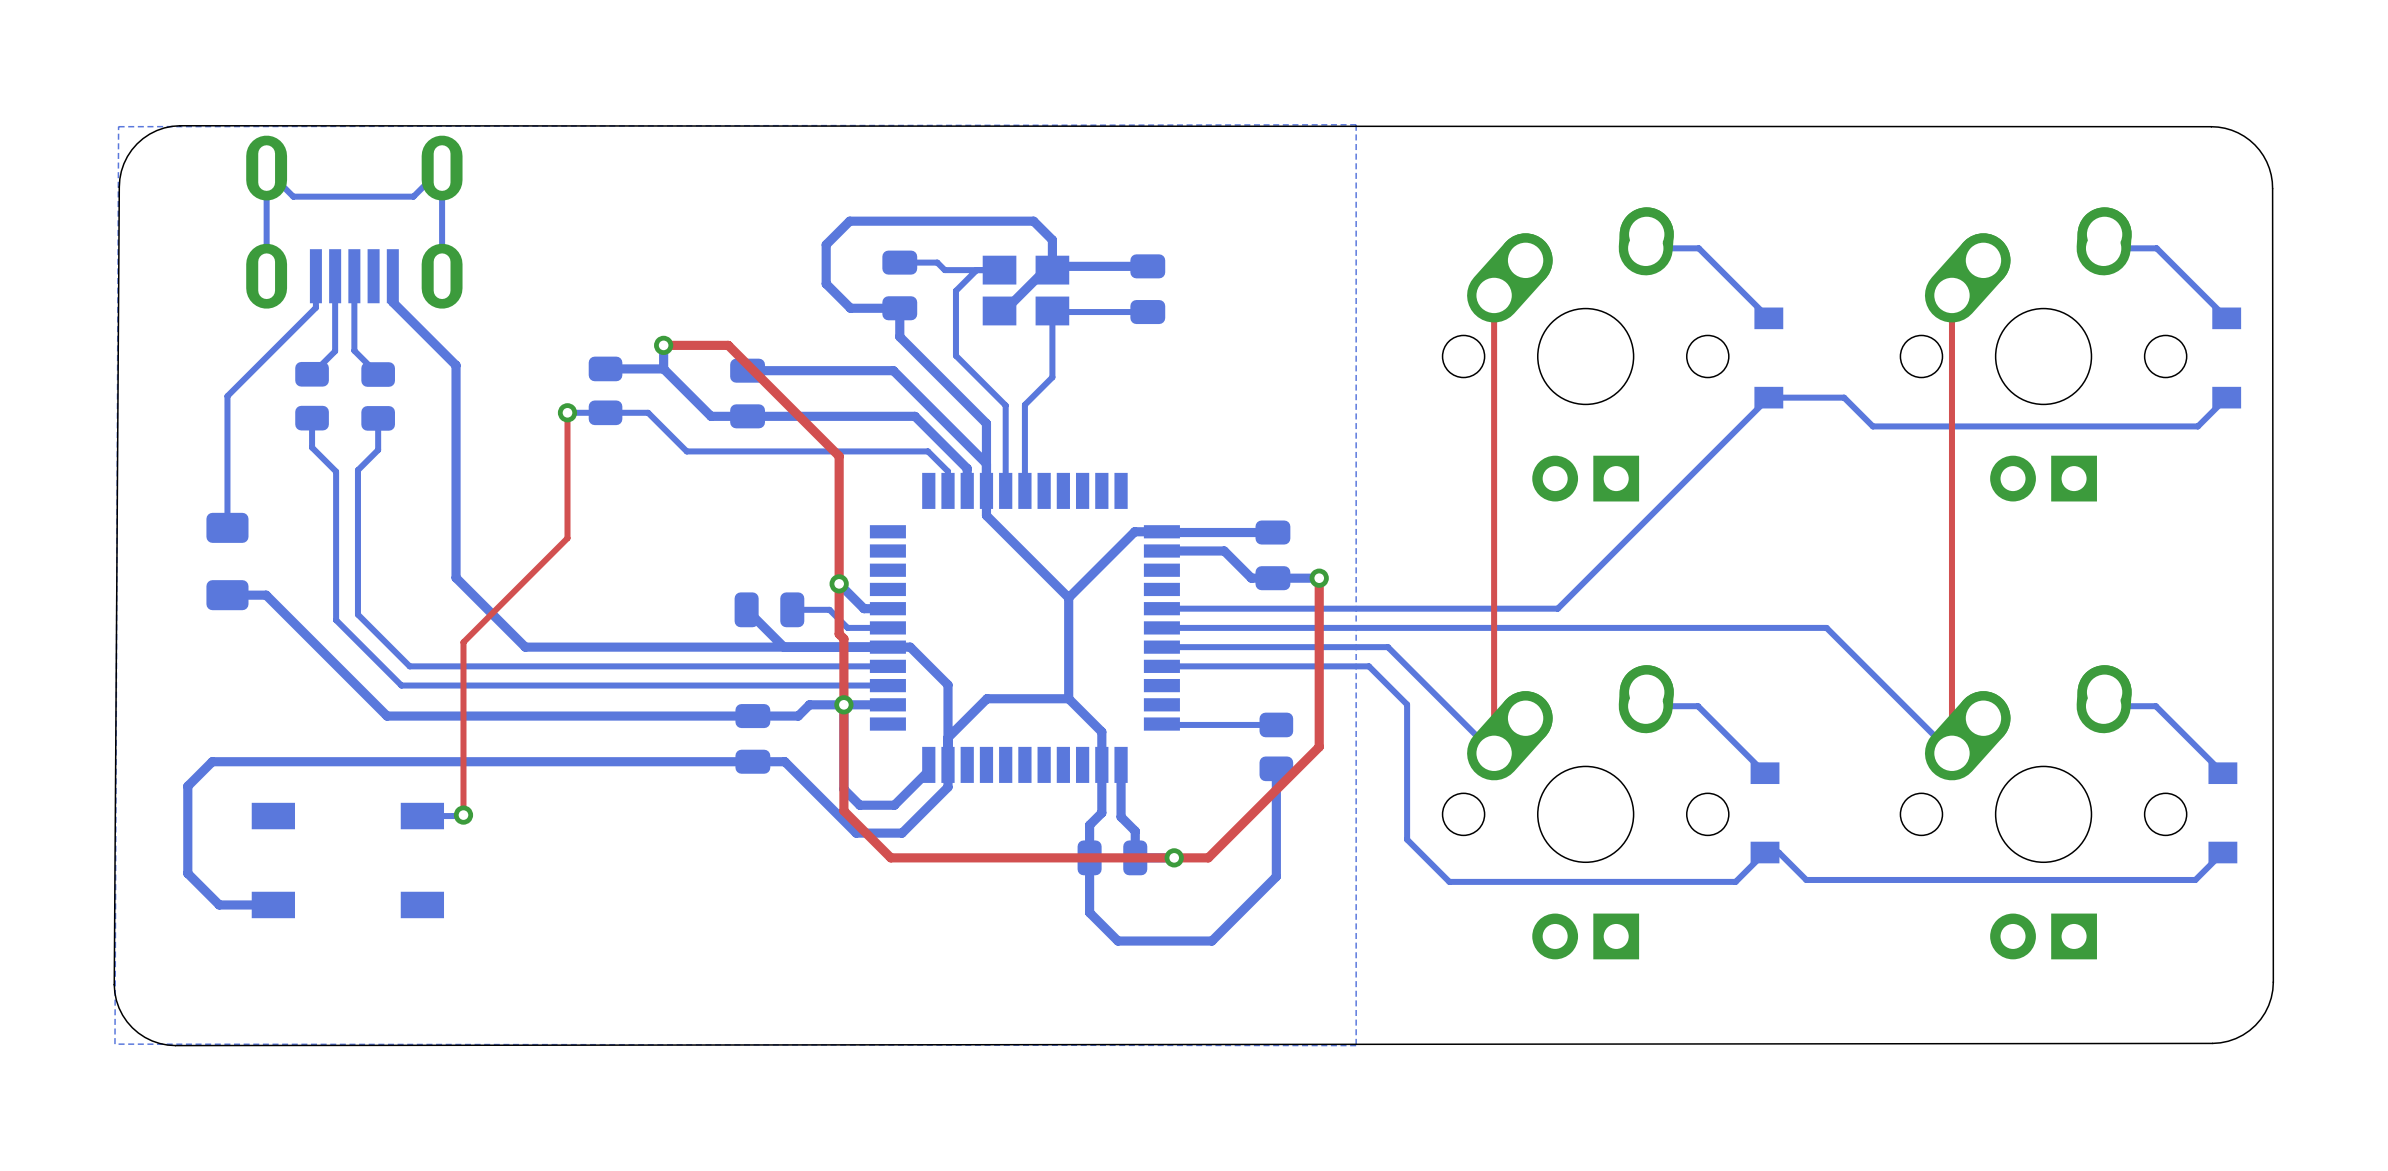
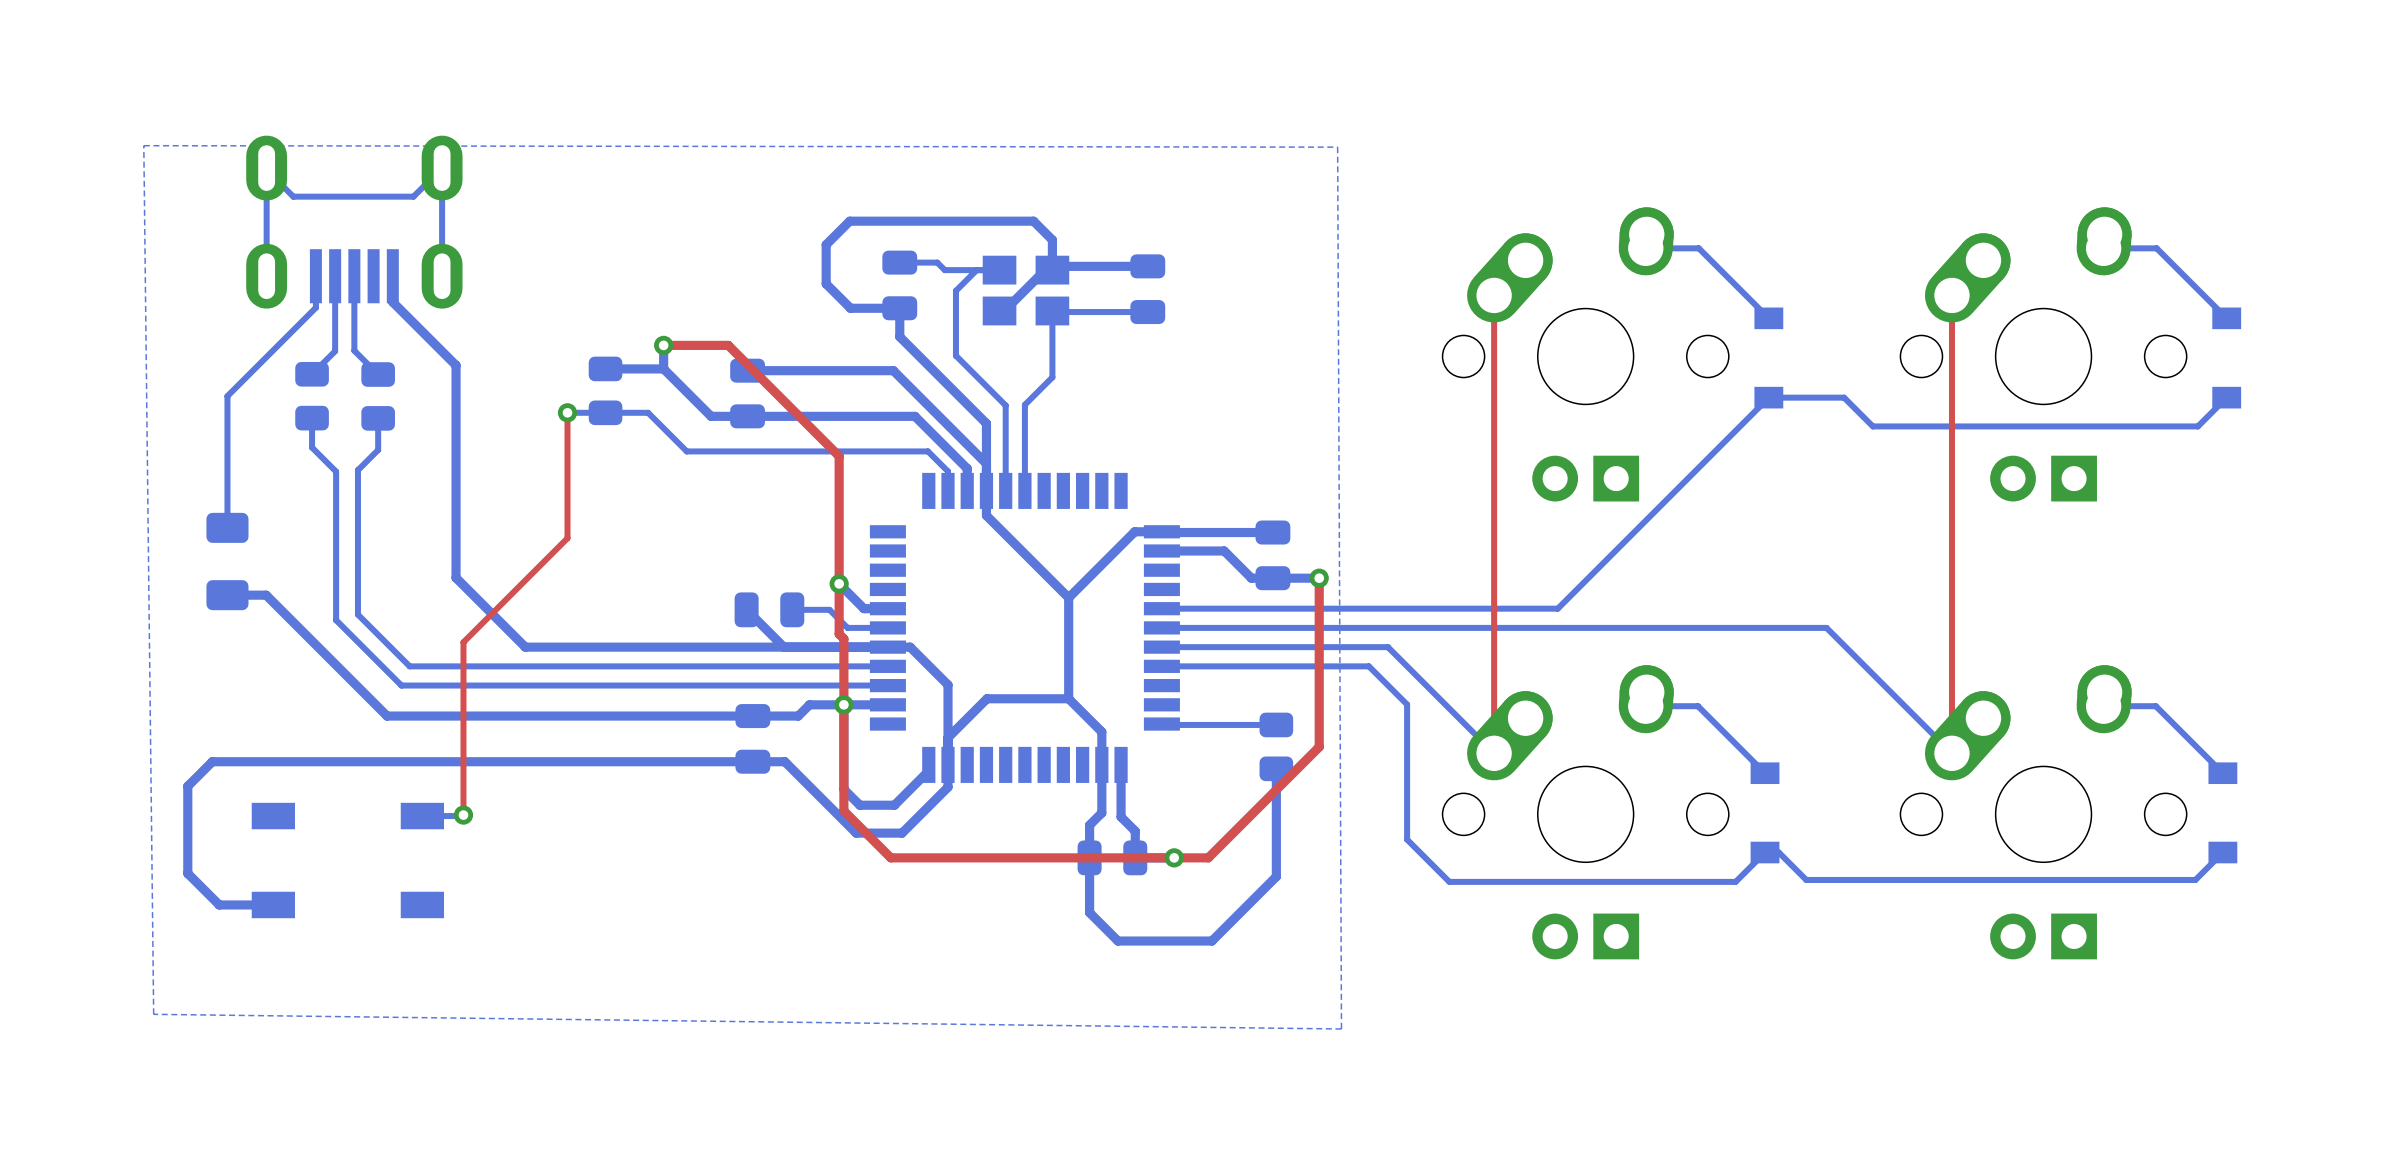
bottom zone outline: (1356, 124) (118, 126) (114, 1044) (1356, 1045) (1356, 124) -> (143, 145) (153, 1014) (1341, 1028) (1337, 147) (143, 145)
board edge: (180, 125) (2211, 126) (2225, 128) (2238, 132) (2254, 144) (2263, 155) (2271, 174) (2272, 188) (2273, 982) (2268, 1005) (2260, 1019) (2249, 1030) (2235, 1038) (2212, 1043) (175, 1045) (152, 1040) (138, 1033) (127, 1021) (119, 1008) (114, 984) (119, 187) (123, 163) (137, 143) (156, 130) (180, 125) -> none

